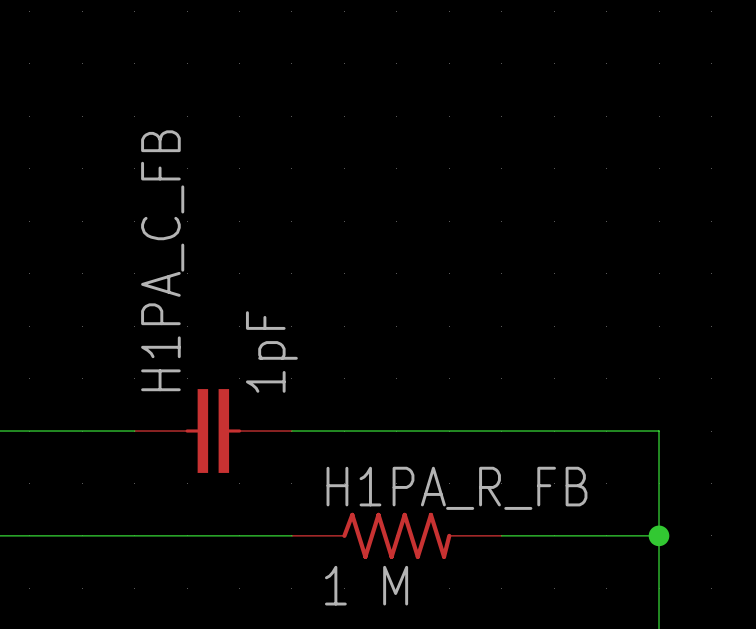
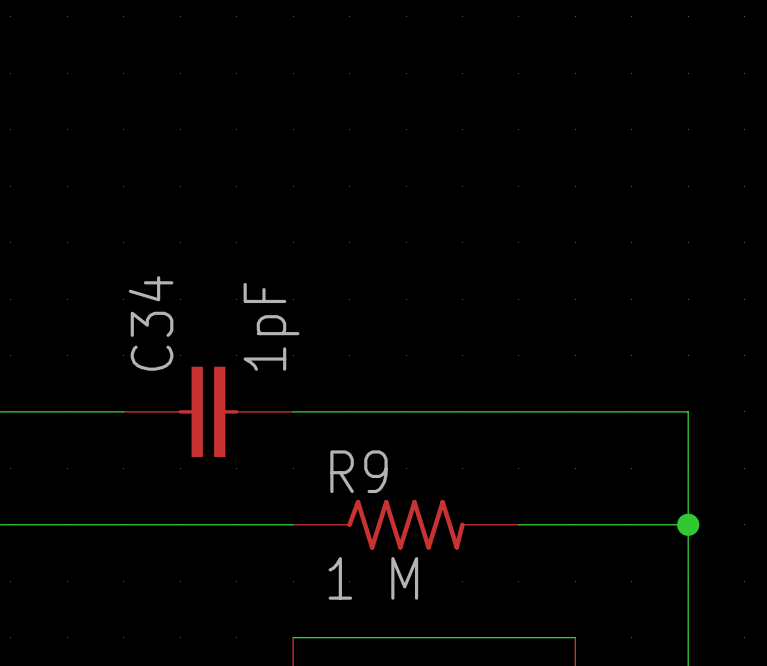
H1PA_C_FB name: H1PA_C_FB (162, 260) -> C34 (151, 323)
H1PA_R_FB name: H1PA_R_FB (456, 488) -> R9 (358, 471)

